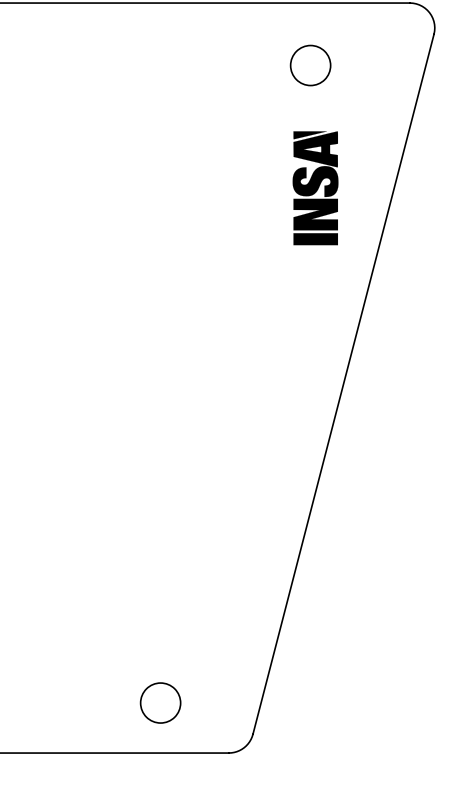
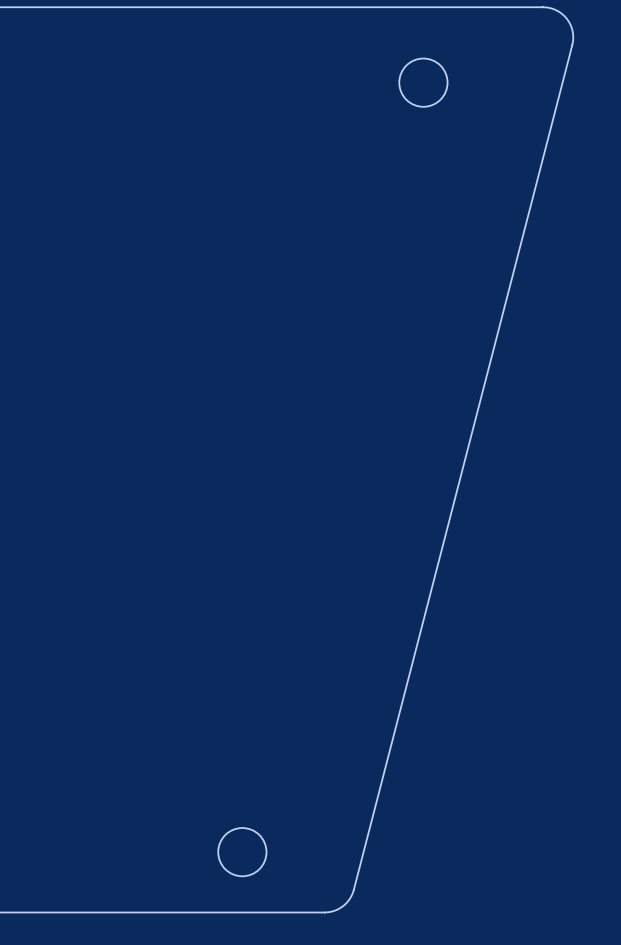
drawing: [292, 131, 339, 246] -> none

